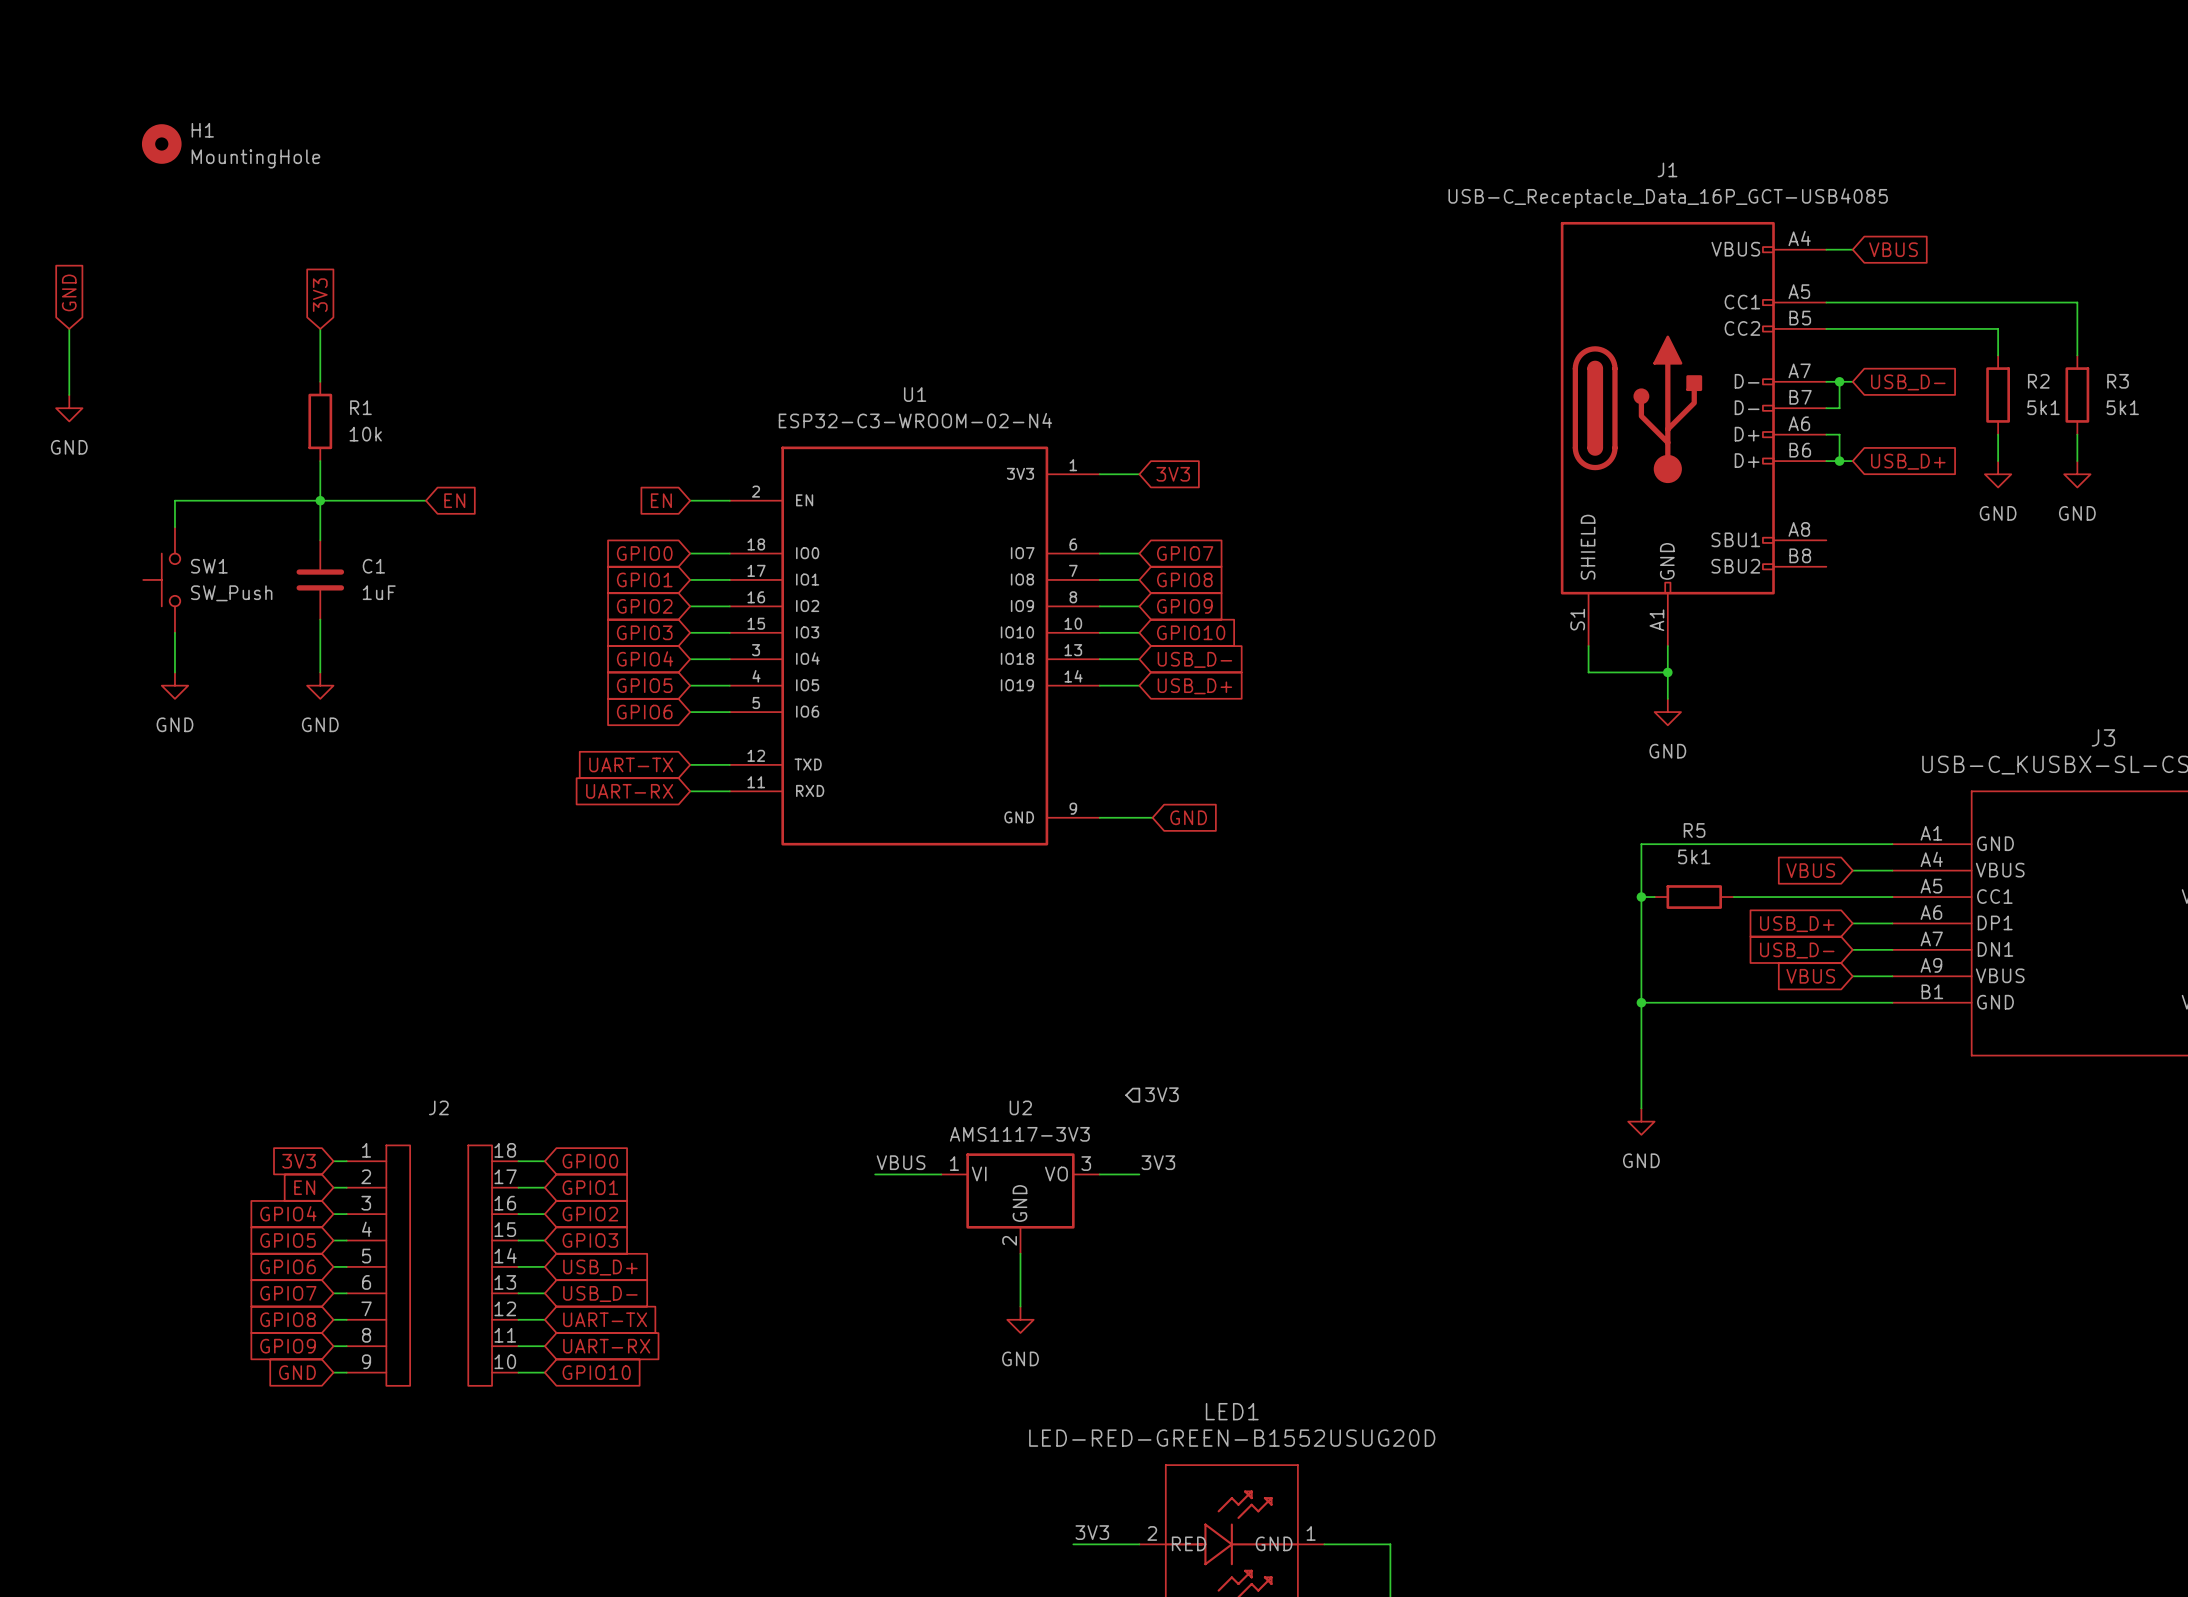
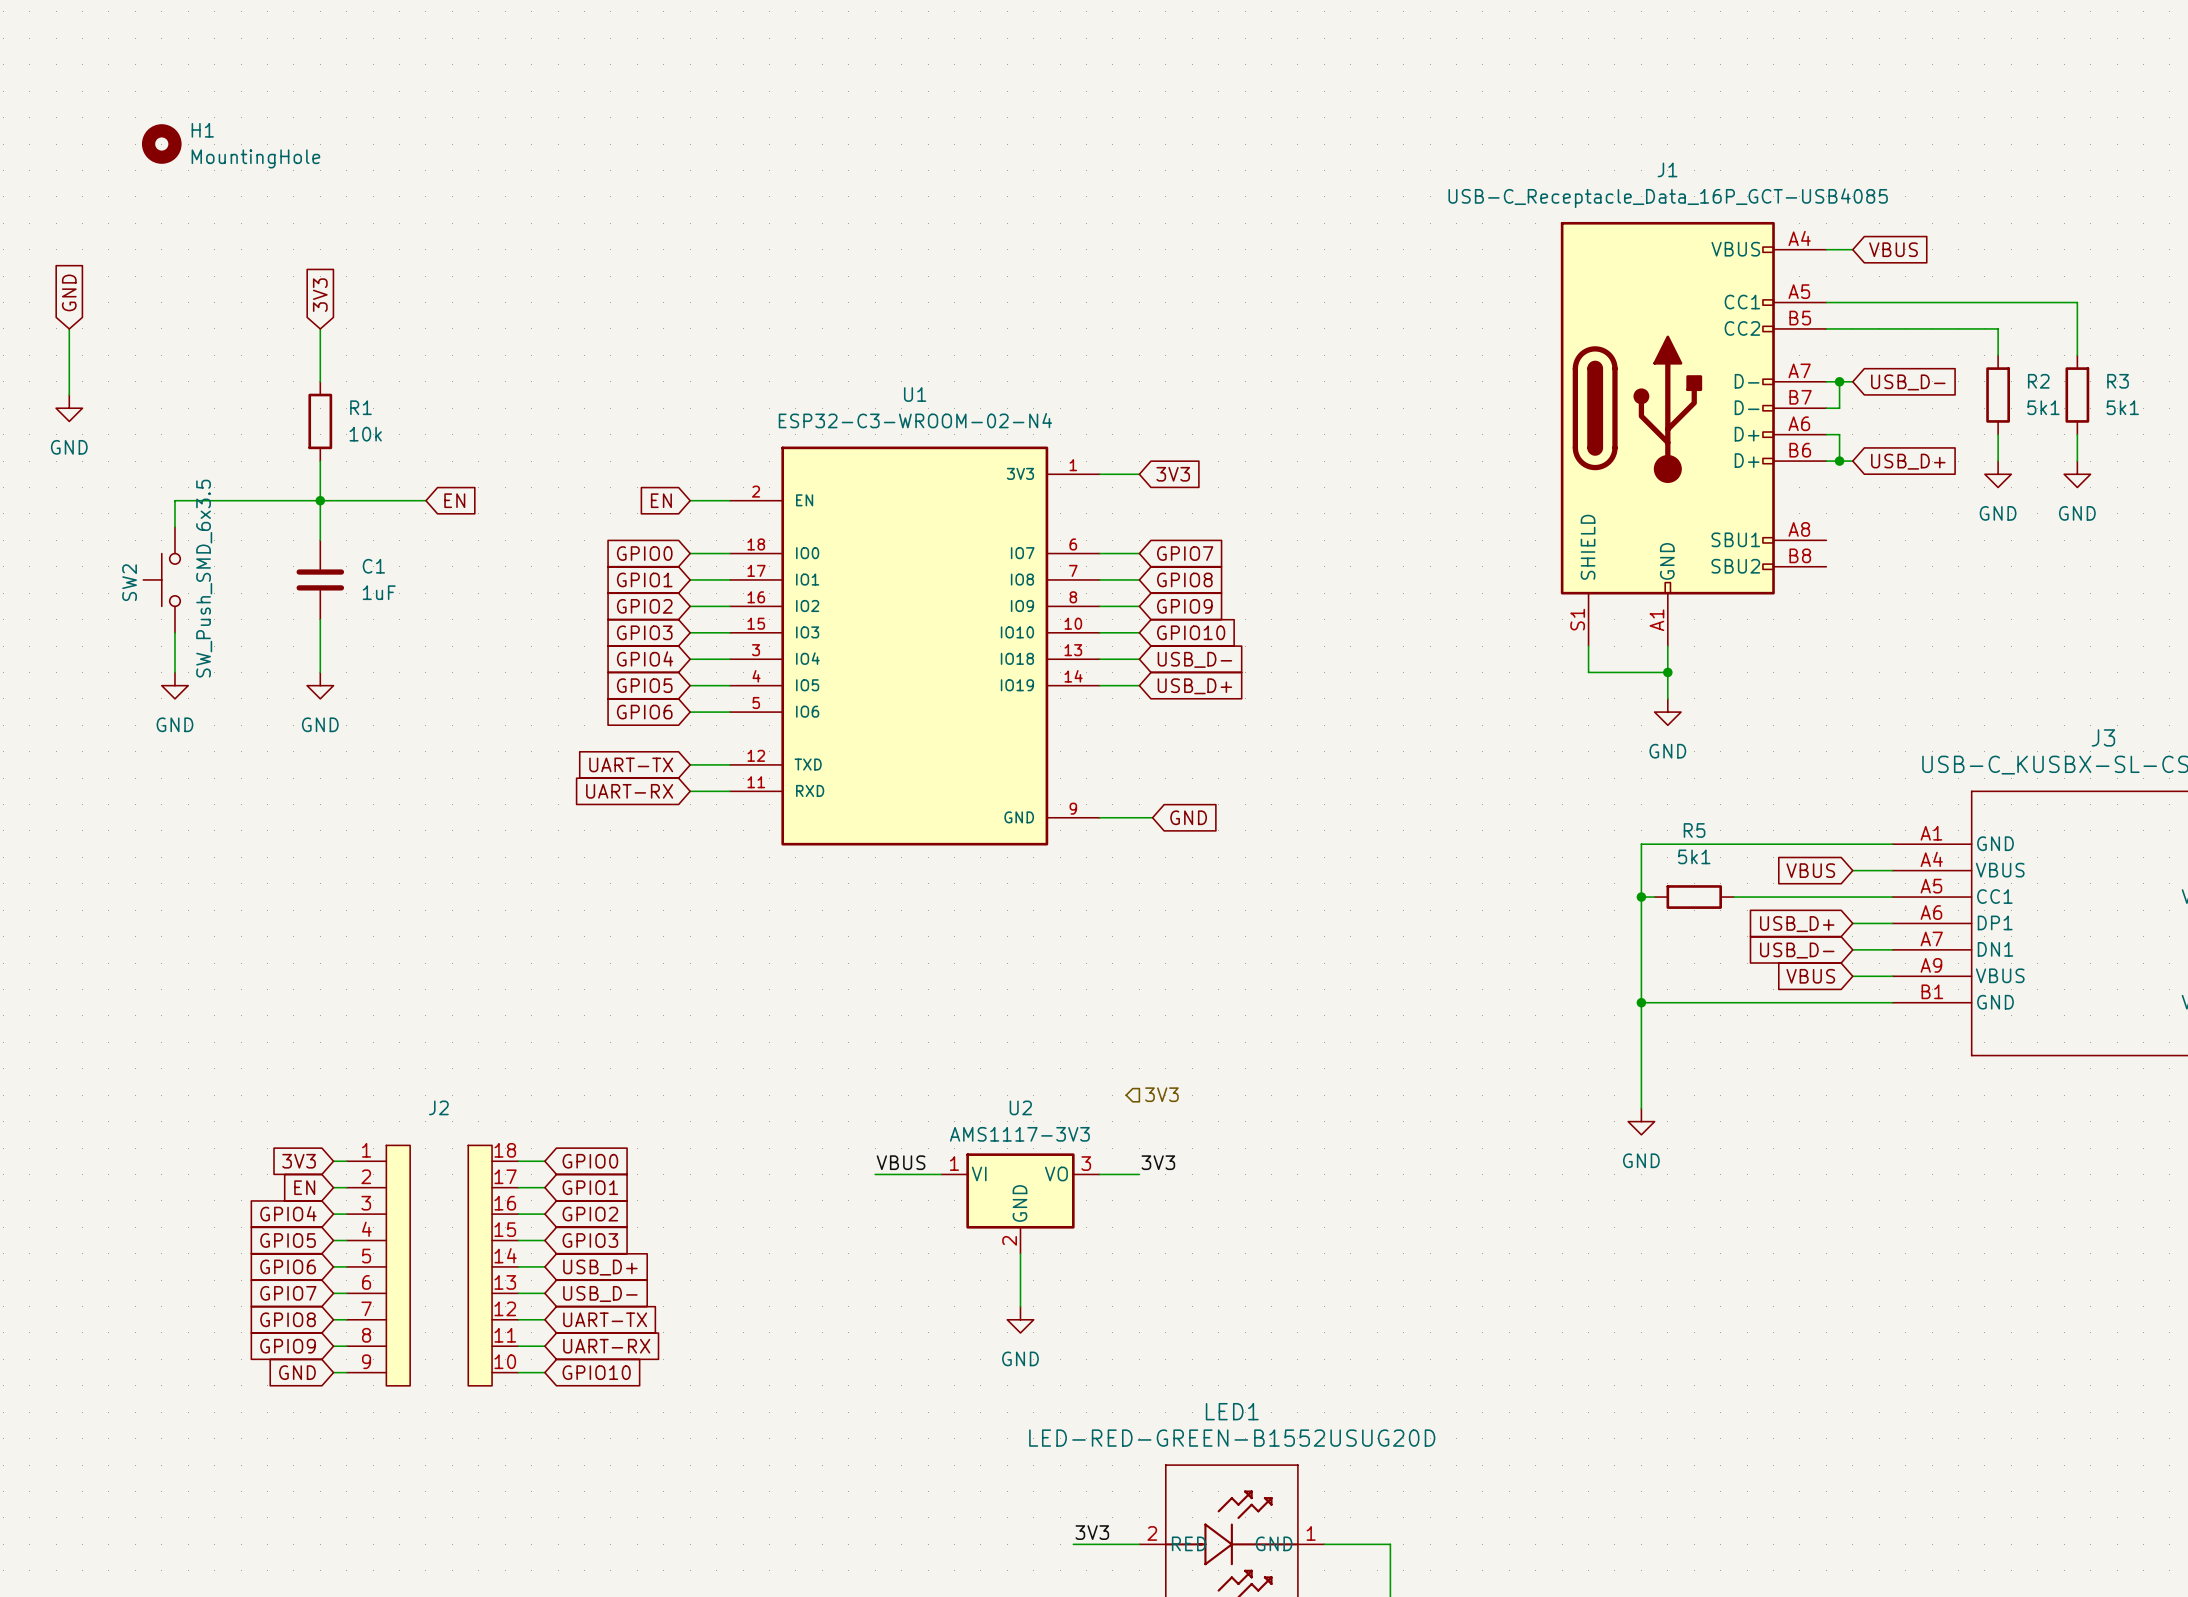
SW1 name: SW1 (209, 566) -> SW2 (129, 582)
SW1 value: SW_Push (231, 593) -> SW_Push_SMD_6x3.5 (204, 578)

